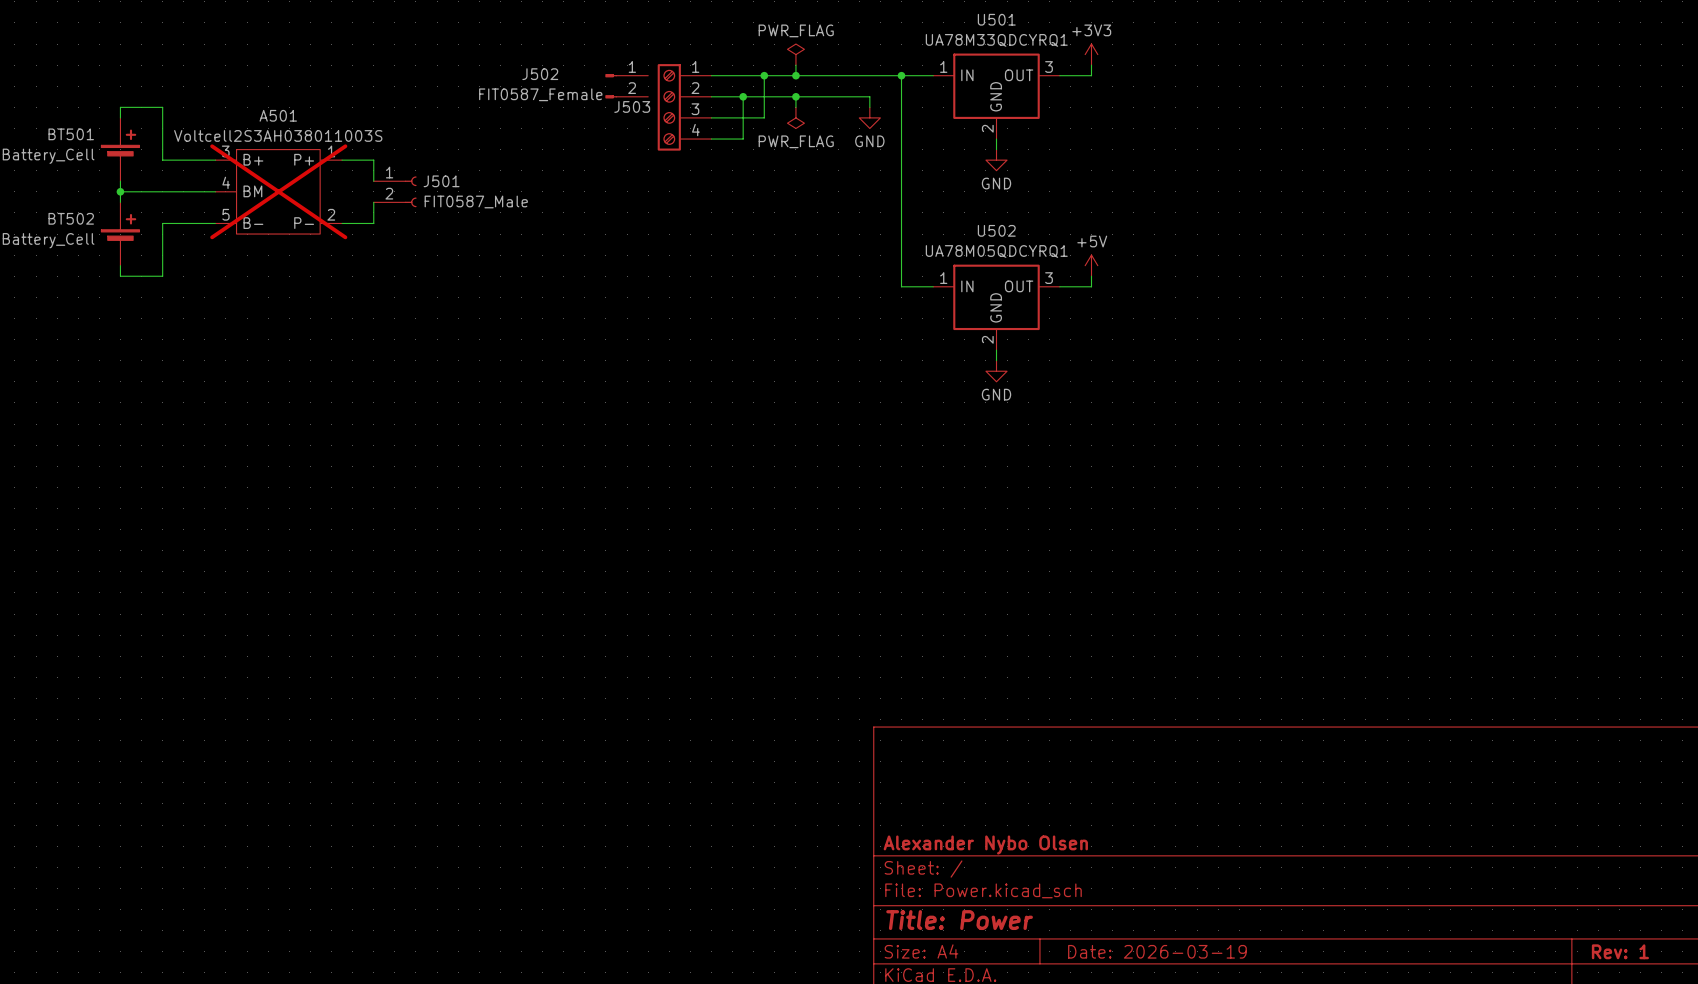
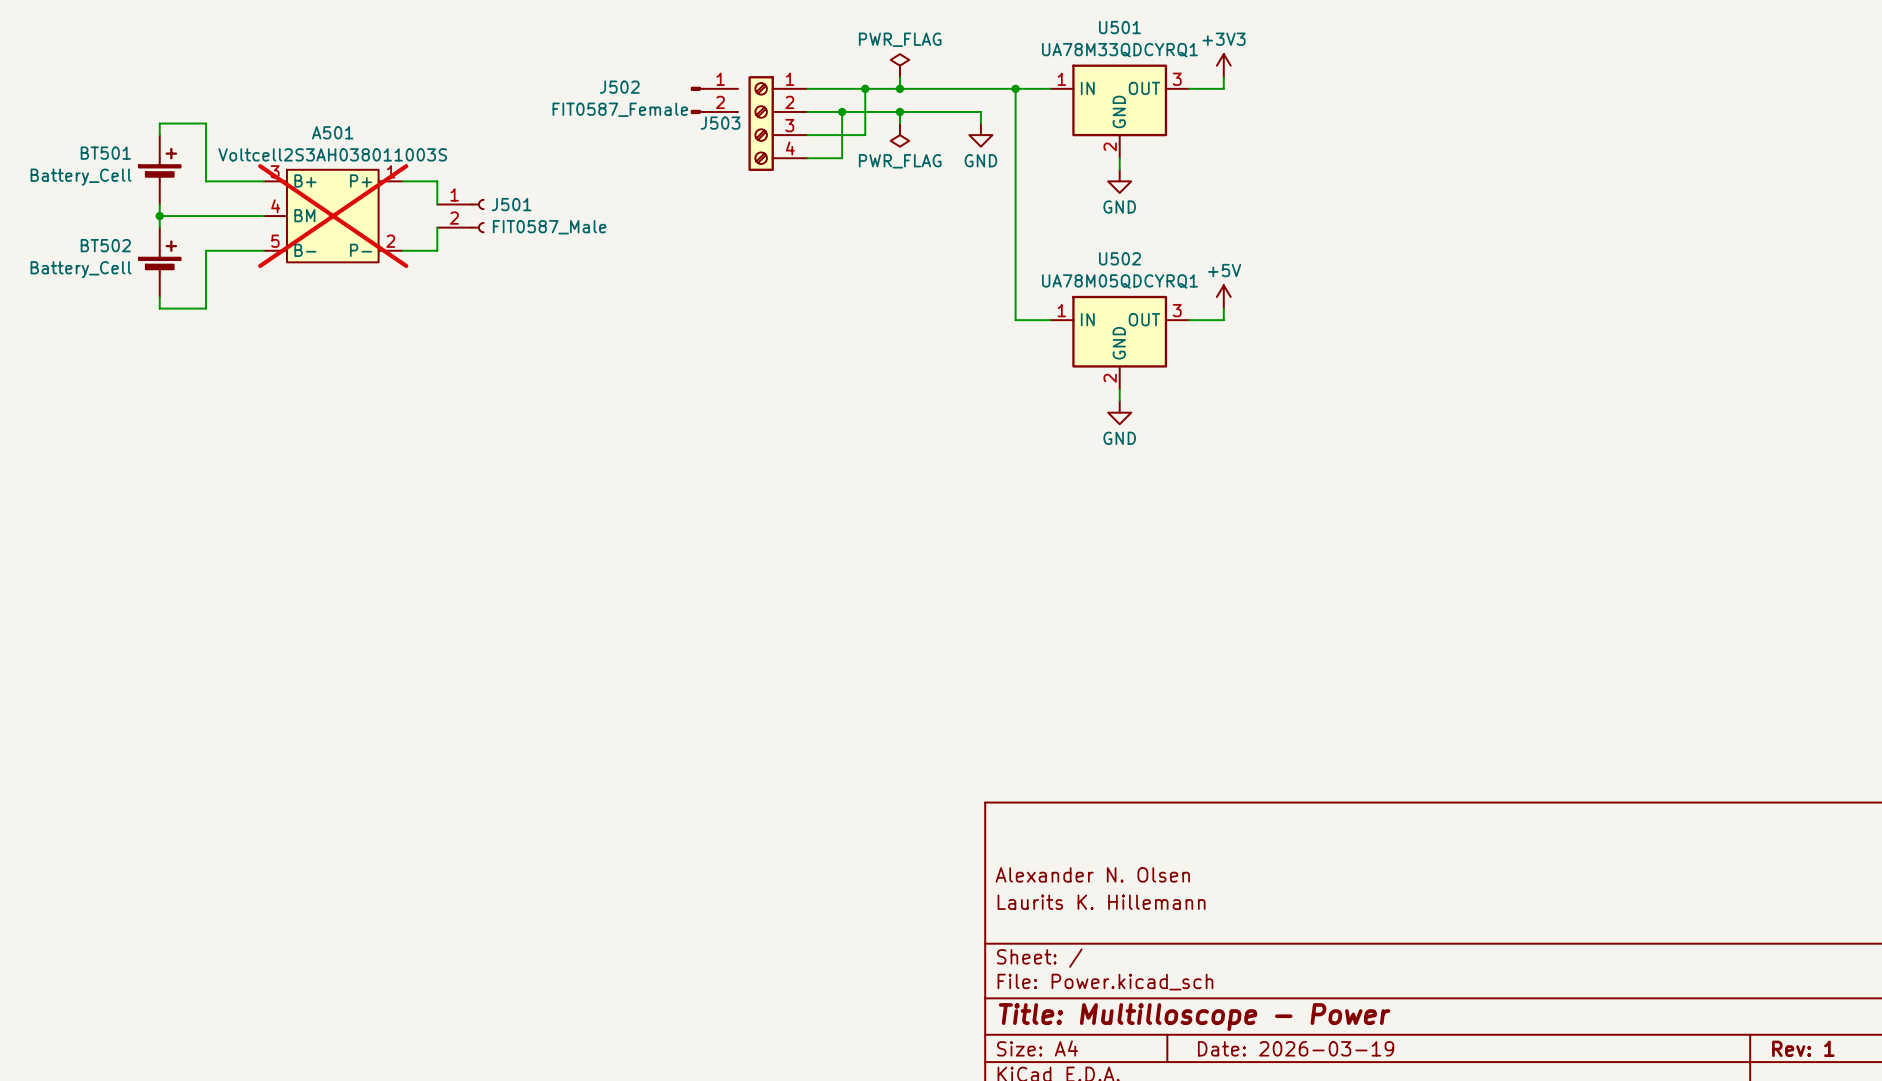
title block: none -> Alexander N. Olsen (1092, 874)
title block: none -> Laurits K. Hillemann (1101, 902)
title block: Alexander Nybo Olsen (985, 844) -> none
title block: Title: Power (959, 920) -> Title: Multilloscope - Power (1194, 1017)

